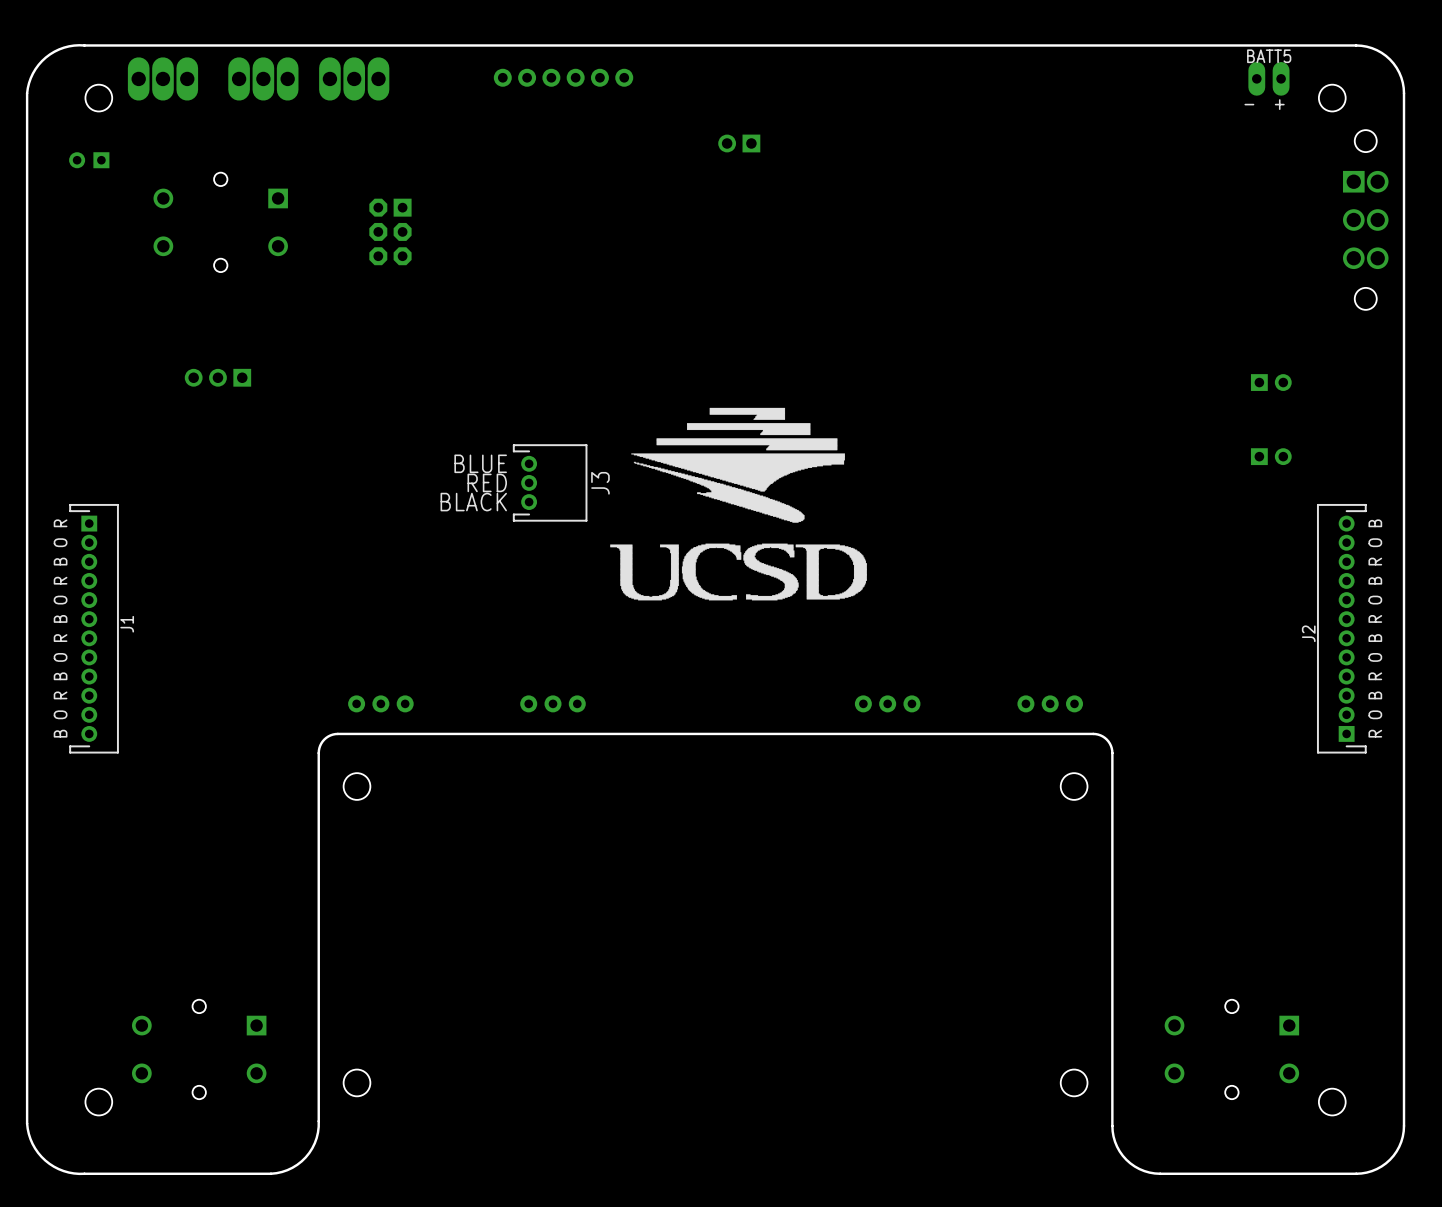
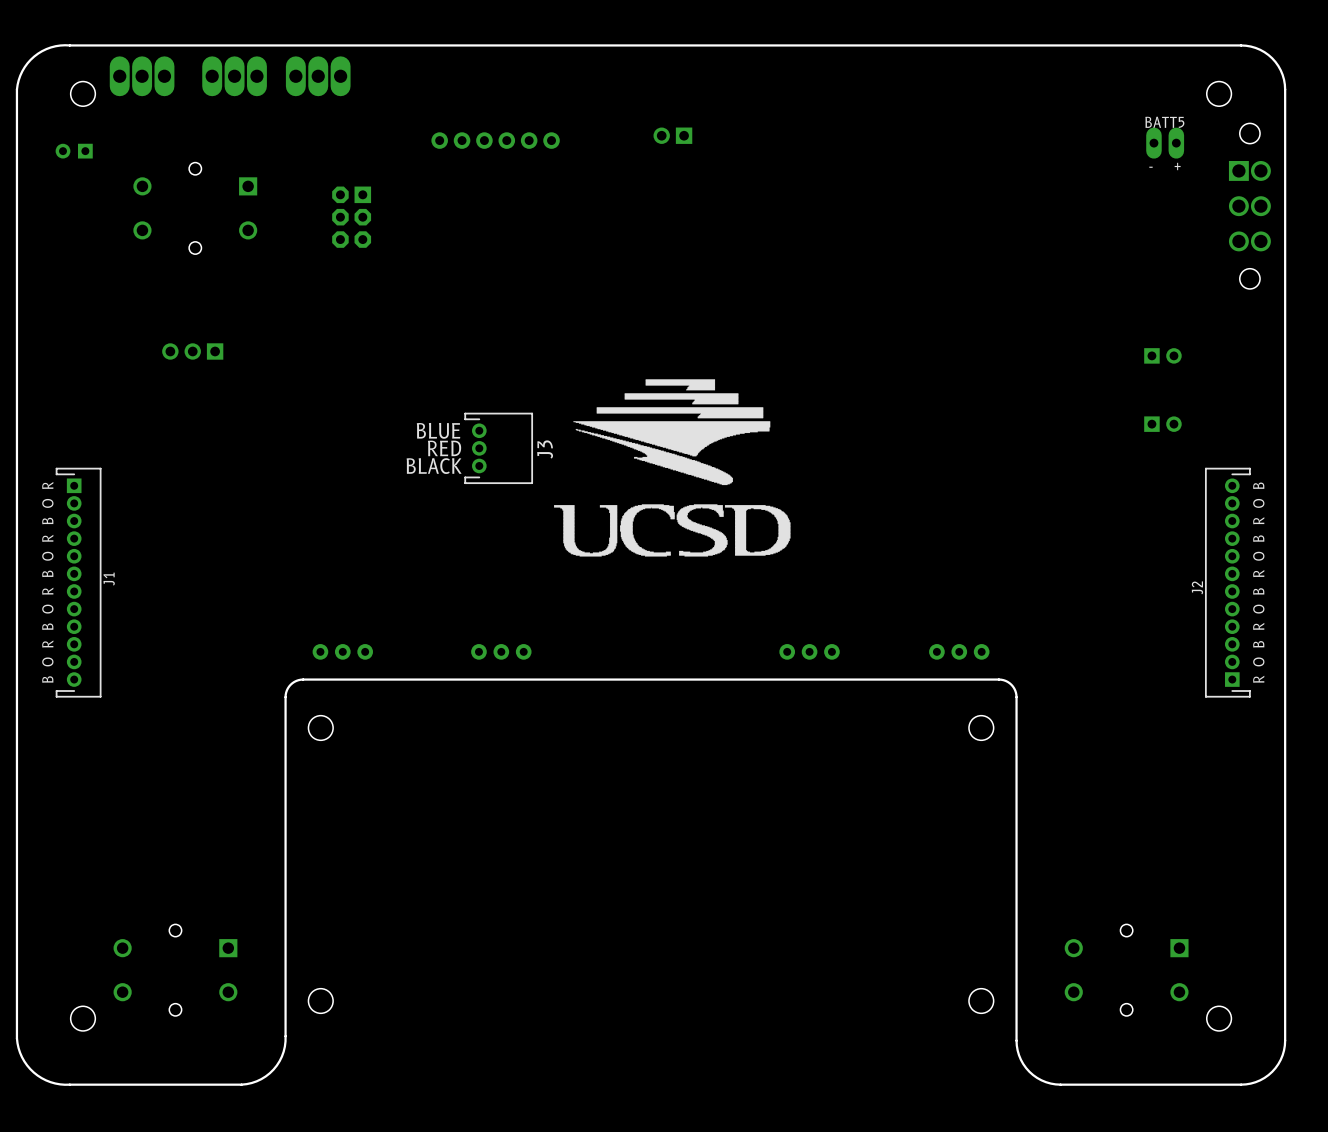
part position: (563, 77) -> (495, 140)
BATT5 position: (1268, 78) -> (1165, 143)

